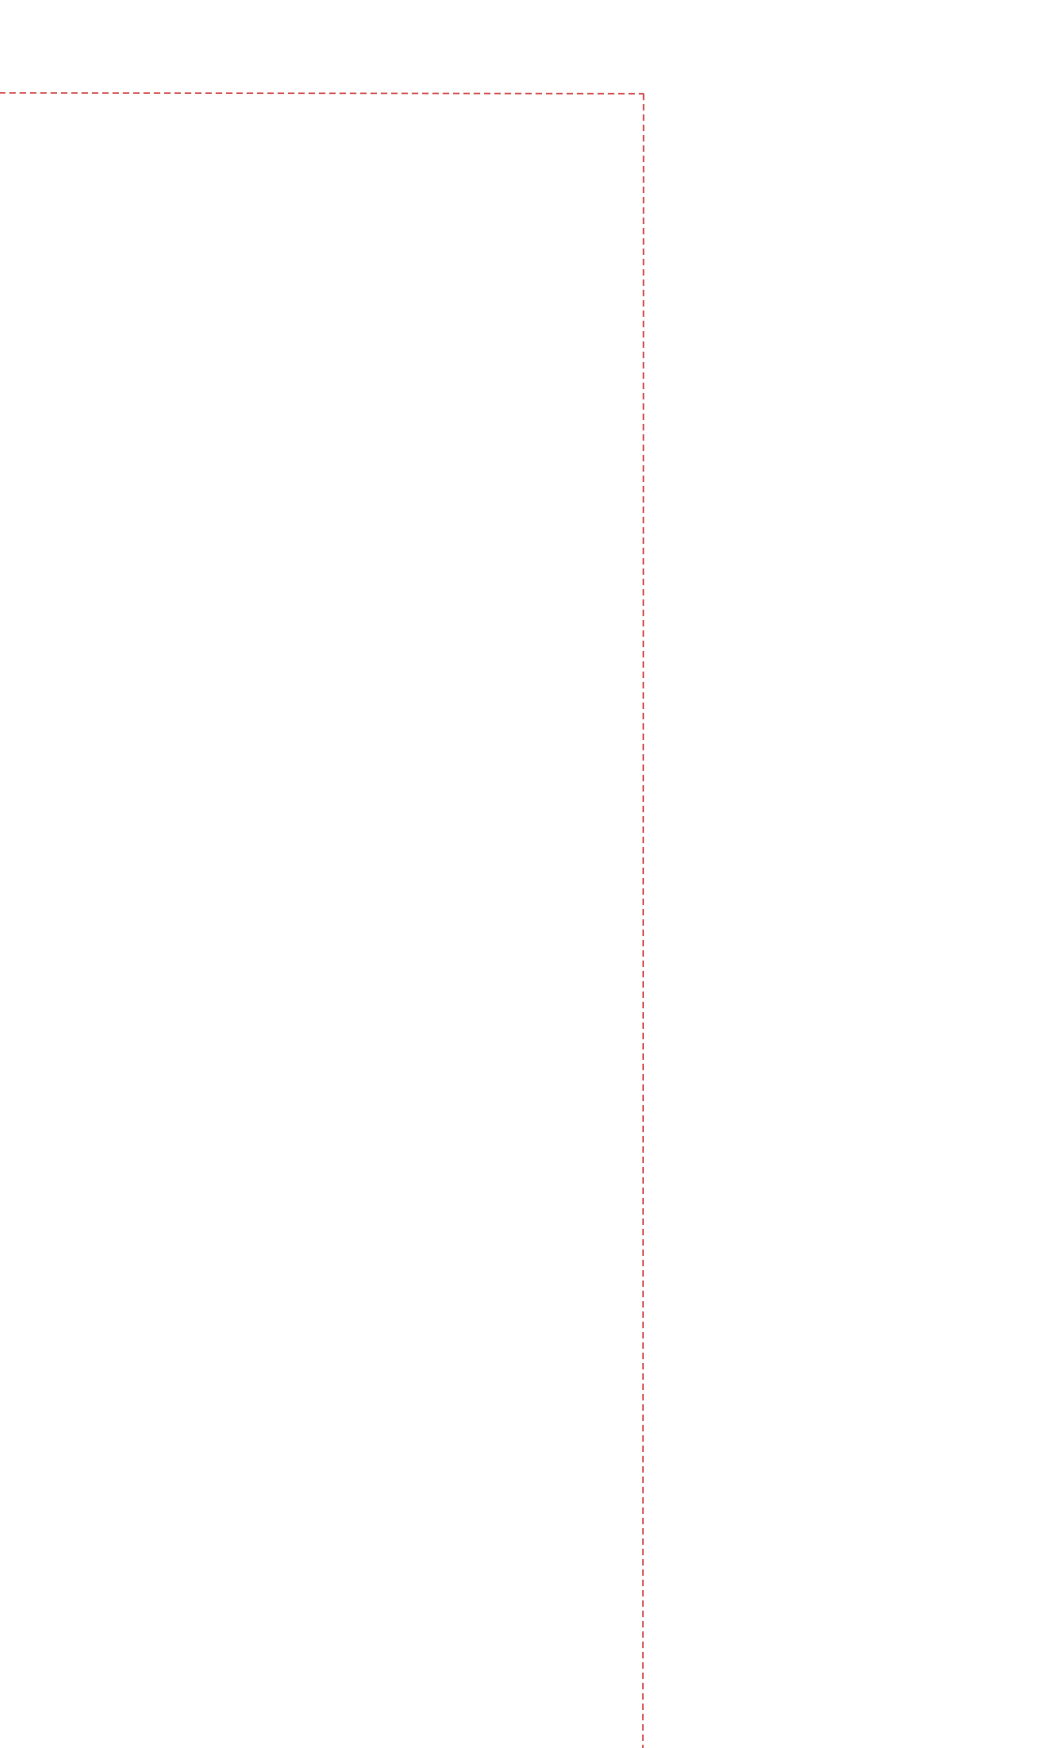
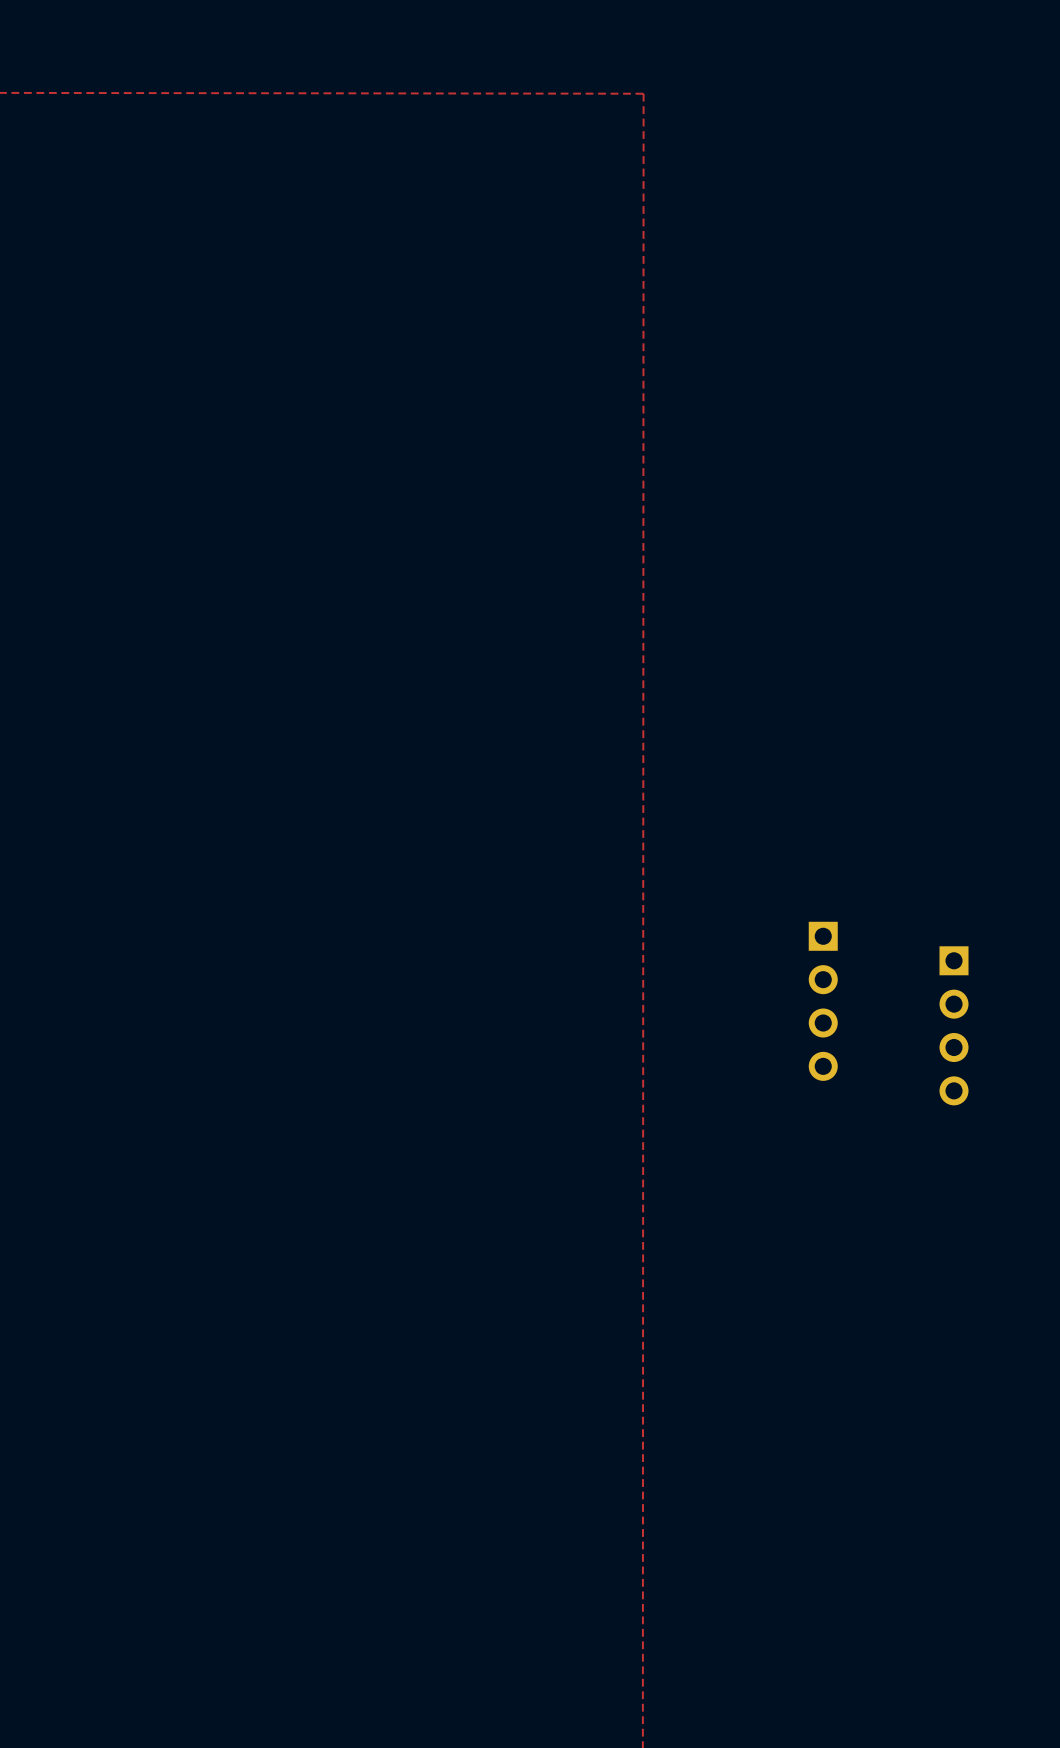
part: none -> (823, 1001)
part: none -> (954, 1025)

